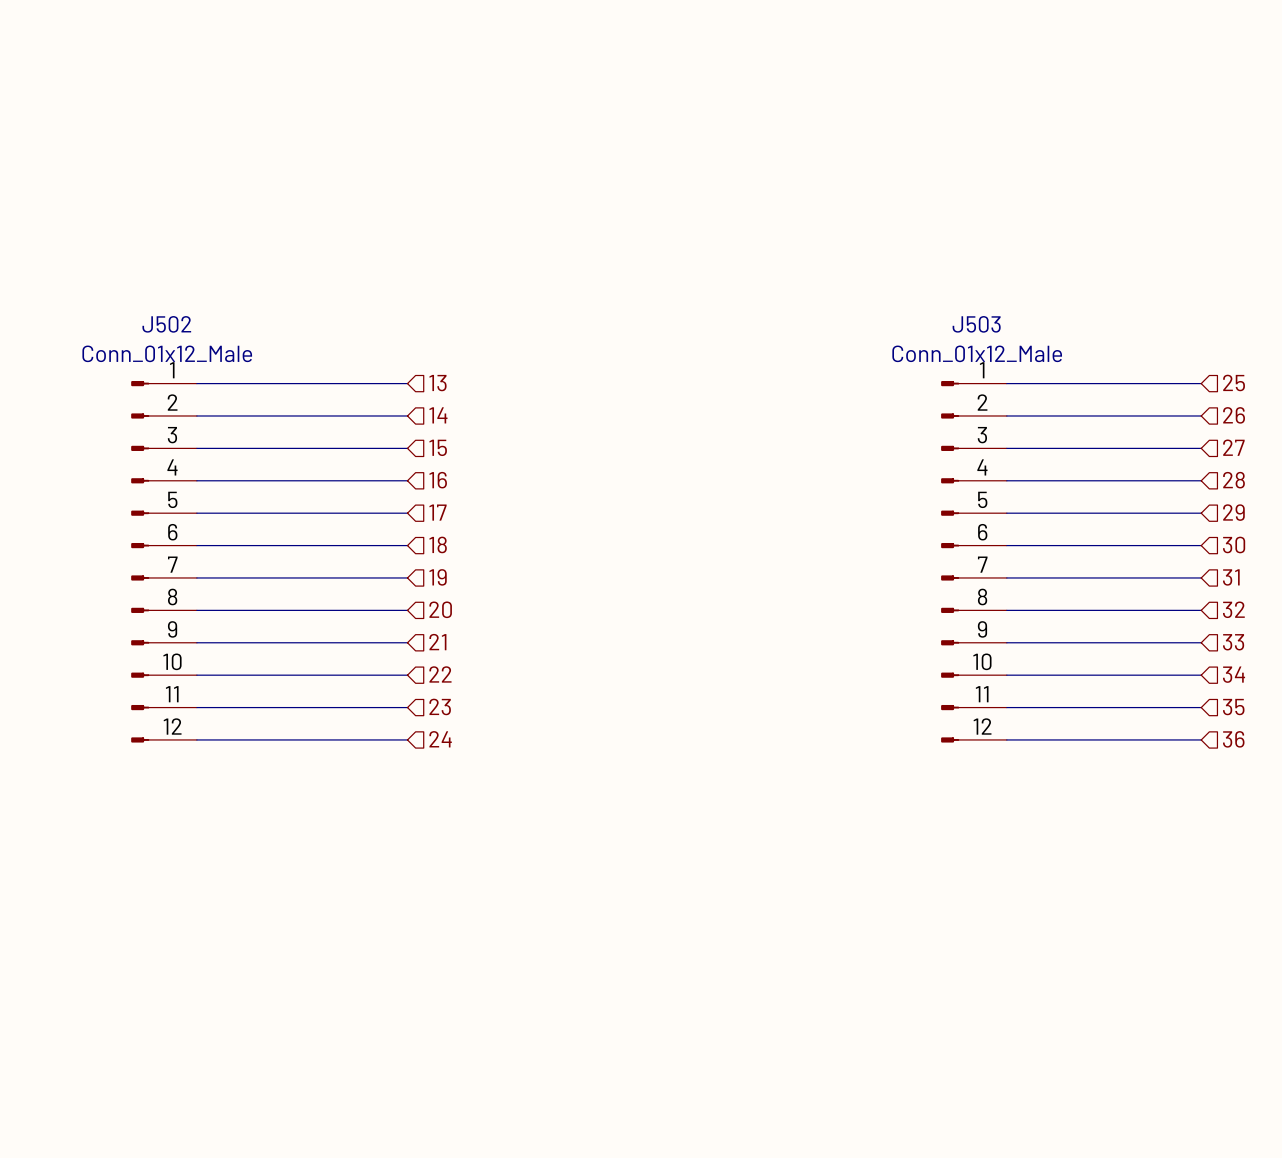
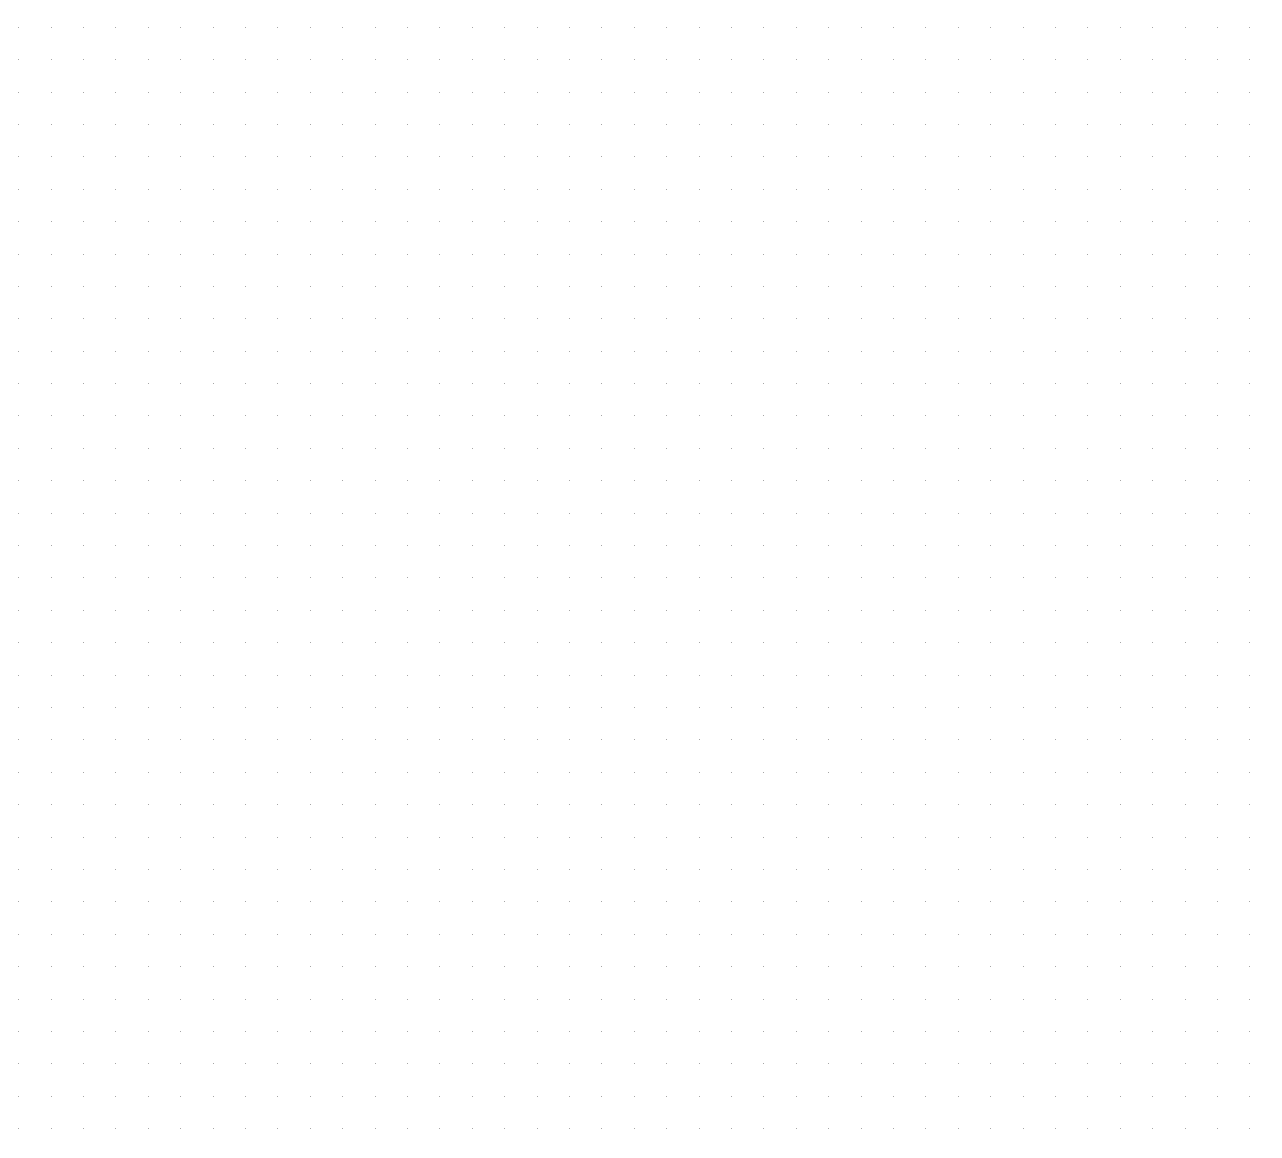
hierarchical label: 25 (1234, 382) -> none
wire: (196, 383) (407, 383) -> none
hierarchical label: 13 (438, 383) -> none
wire: (1006, 383) (1201, 383) -> none
wire: (196, 415) (407, 415) -> none
hierarchical label: 14 (438, 415) -> none
wire: (1006, 415) (1201, 415) -> none
hierarchical label: 26 (1234, 415) -> none
hierarchical label: 15 (438, 447) -> none
hierarchical label: 27 (1233, 447) -> none
wire: (196, 448) (407, 448) -> none
wire: (1006, 448) (1201, 448) -> none
wire: (196, 480) (407, 480) -> none
hierarchical label: 16 (438, 480) -> none
wire: (1006, 480) (1201, 480) -> none
hierarchical label: 28 (1234, 480) -> none
hierarchical label: 17 (438, 512) -> none
hierarchical label: 29 (1233, 512) -> none
wire: (196, 513) (407, 513) -> none
wire: (1006, 513) (1201, 513) -> none
hierarchical label: 18 (438, 544) -> none
hierarchical label: 30 (1234, 544) -> none
wire: (196, 545) (407, 545) -> none
wire: (1006, 545) (1201, 545) -> none
J502: Conn_01x12_Male (164, 561) -> none
J503: Conn_01x12_Male (973, 561) -> none
wire: (196, 577) (407, 577) -> none
hierarchical label: 19 (438, 577) -> none
wire: (1006, 577) (1201, 577) -> none
hierarchical label: 31 (1231, 577) -> none
hierarchical label: 20 (440, 609) -> none
hierarchical label: 32 (1233, 609) -> none
wire: (196, 610) (407, 610) -> none
wire: (1006, 610) (1201, 610) -> none
wire: (196, 642) (407, 642) -> none
hierarchical label: 21 (437, 642) -> none
wire: (1006, 642) (1201, 642) -> none
hierarchical label: 33 (1233, 642) -> none
hierarchical label: 22 (440, 674) -> none
hierarchical label: 34 (1234, 674) -> none
wire: (196, 675) (407, 675) -> none
wire: (1006, 675) (1201, 675) -> none
hierarchical label: 23 (440, 706) -> none
wire: (196, 707) (407, 707) -> none
wire: (1006, 707) (1201, 707) -> none
hierarchical label: 35 (1233, 707) -> none
wire: (196, 739) (407, 739) -> none
hierarchical label: 24 (440, 739) -> none
wire: (1006, 739) (1201, 739) -> none
hierarchical label: 36 (1233, 739) -> none

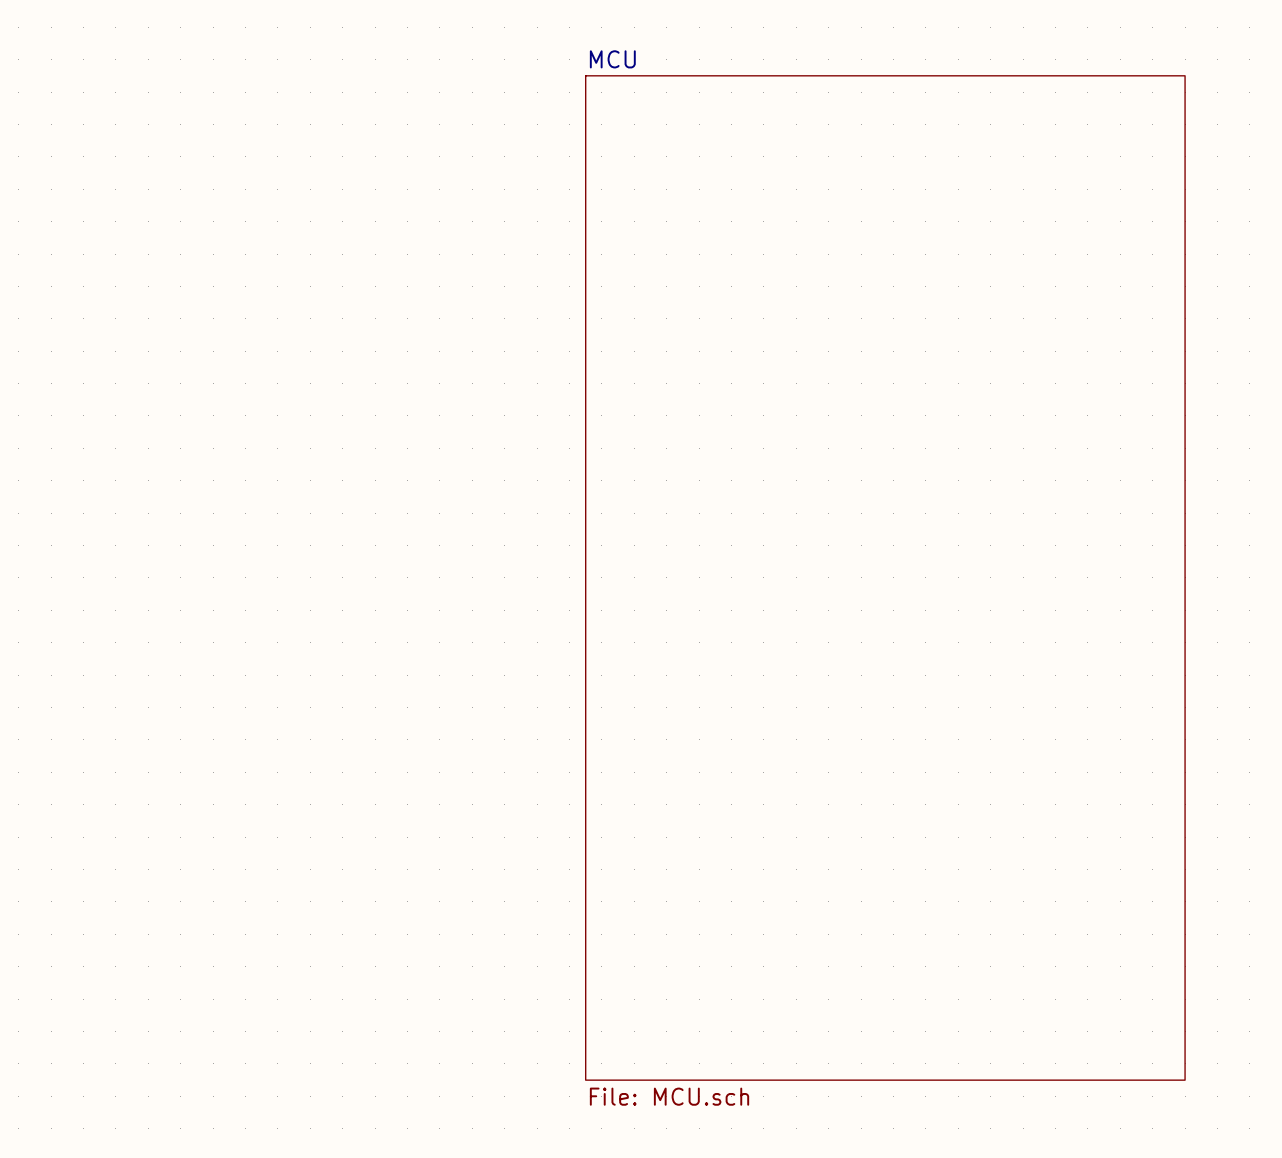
sheet MCU: none -> File: MCU.sch (885, 577)

